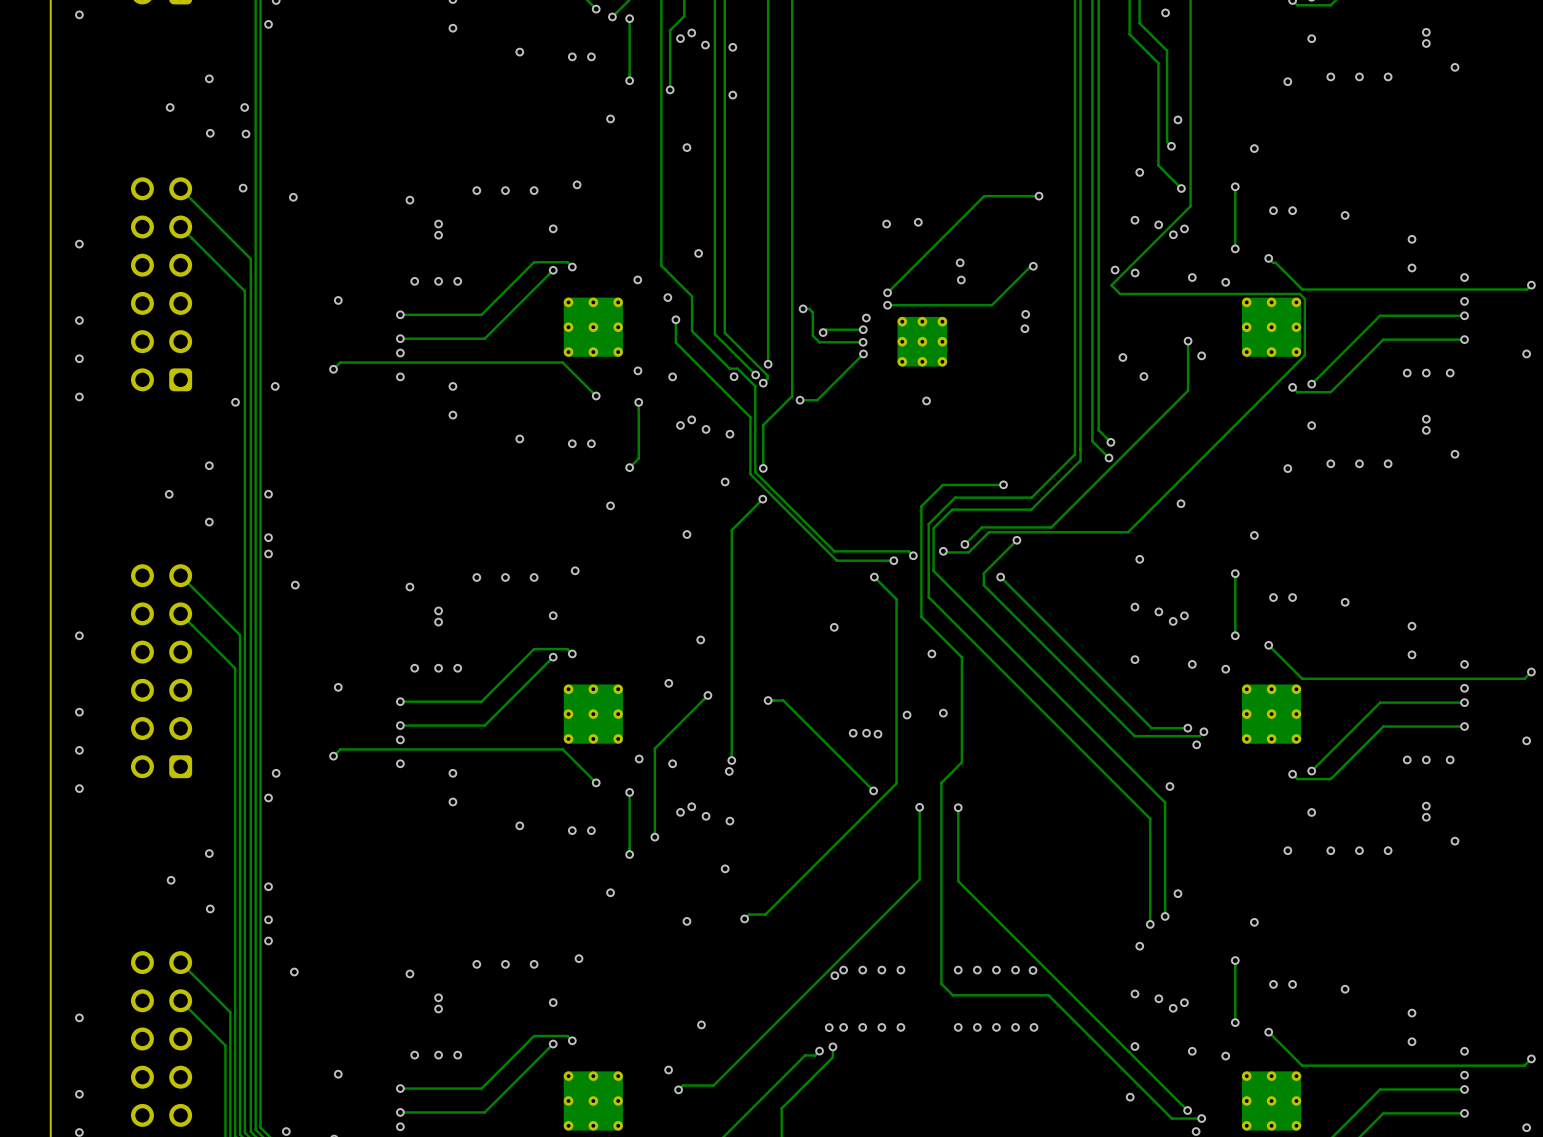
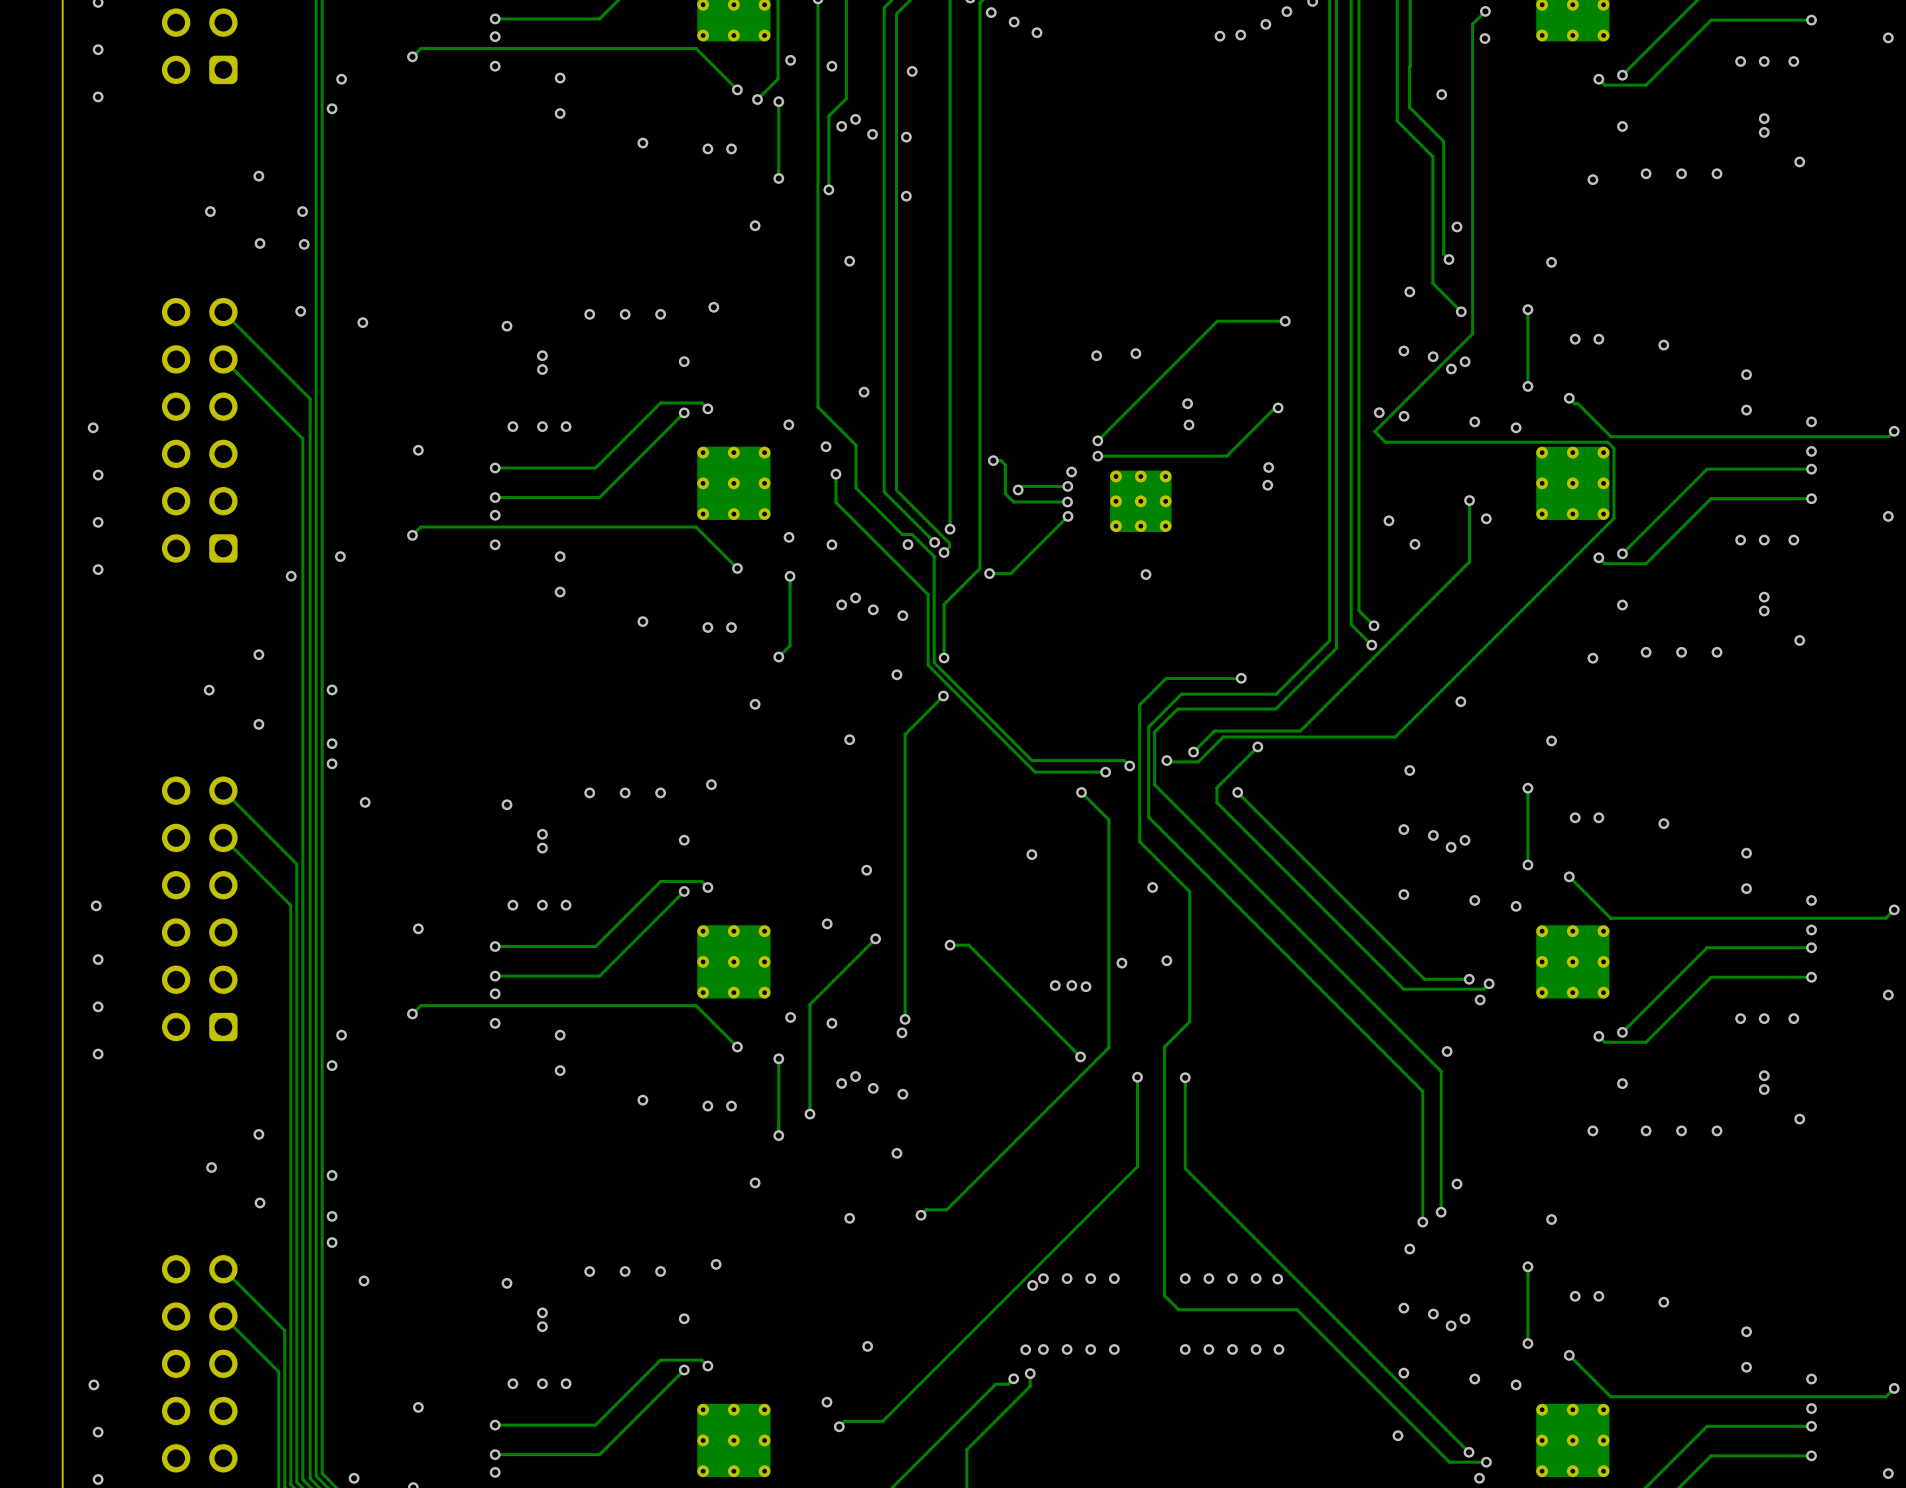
via position: (79, 244) -> (93, 427)
via position: (79, 635) -> (96, 905)
via position: (79, 1017) -> (93, 1384)

